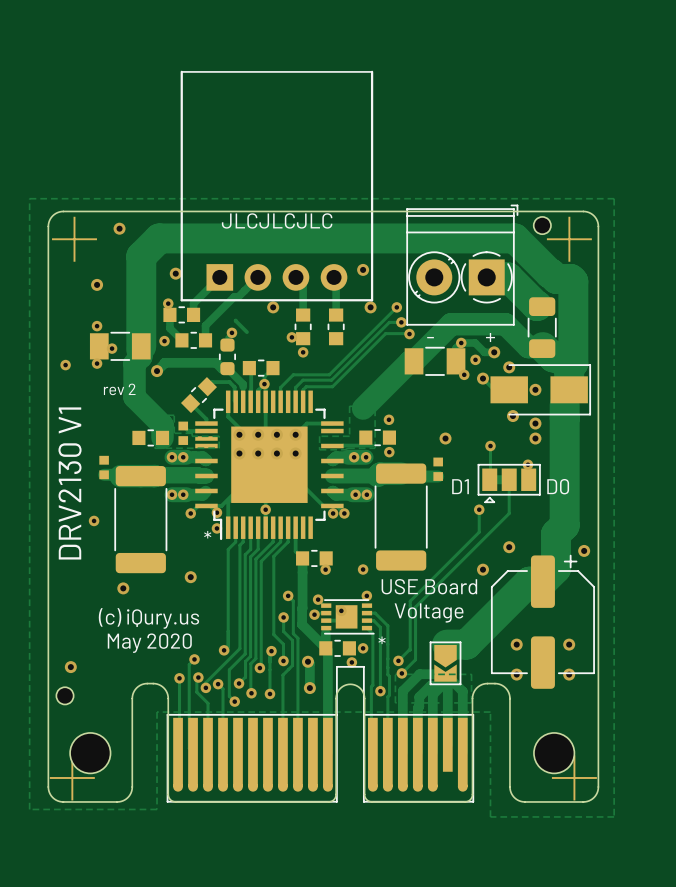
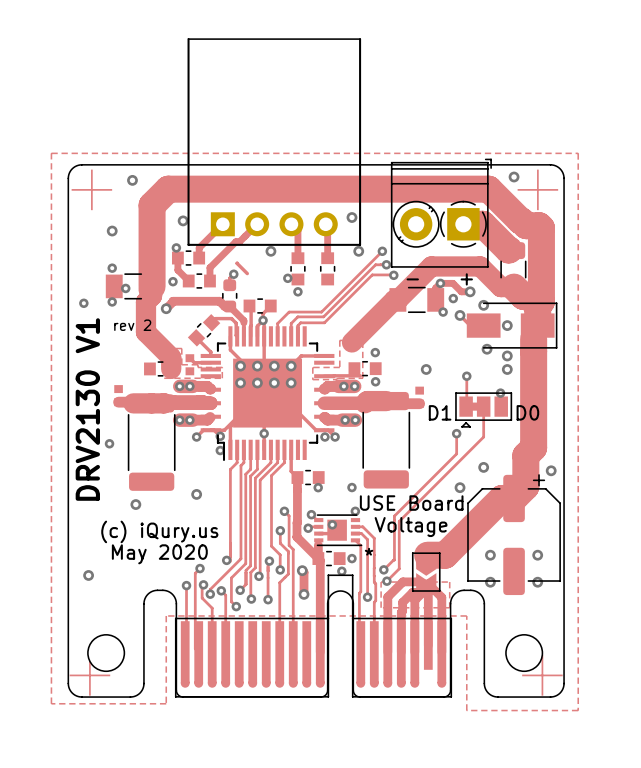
text: JLCJLCJLC (277, 220) -> none
via: none -> (514, 177)
part: (542, 225) -> none
text: * (207, 534) -> none
part: (64, 695) -> none

